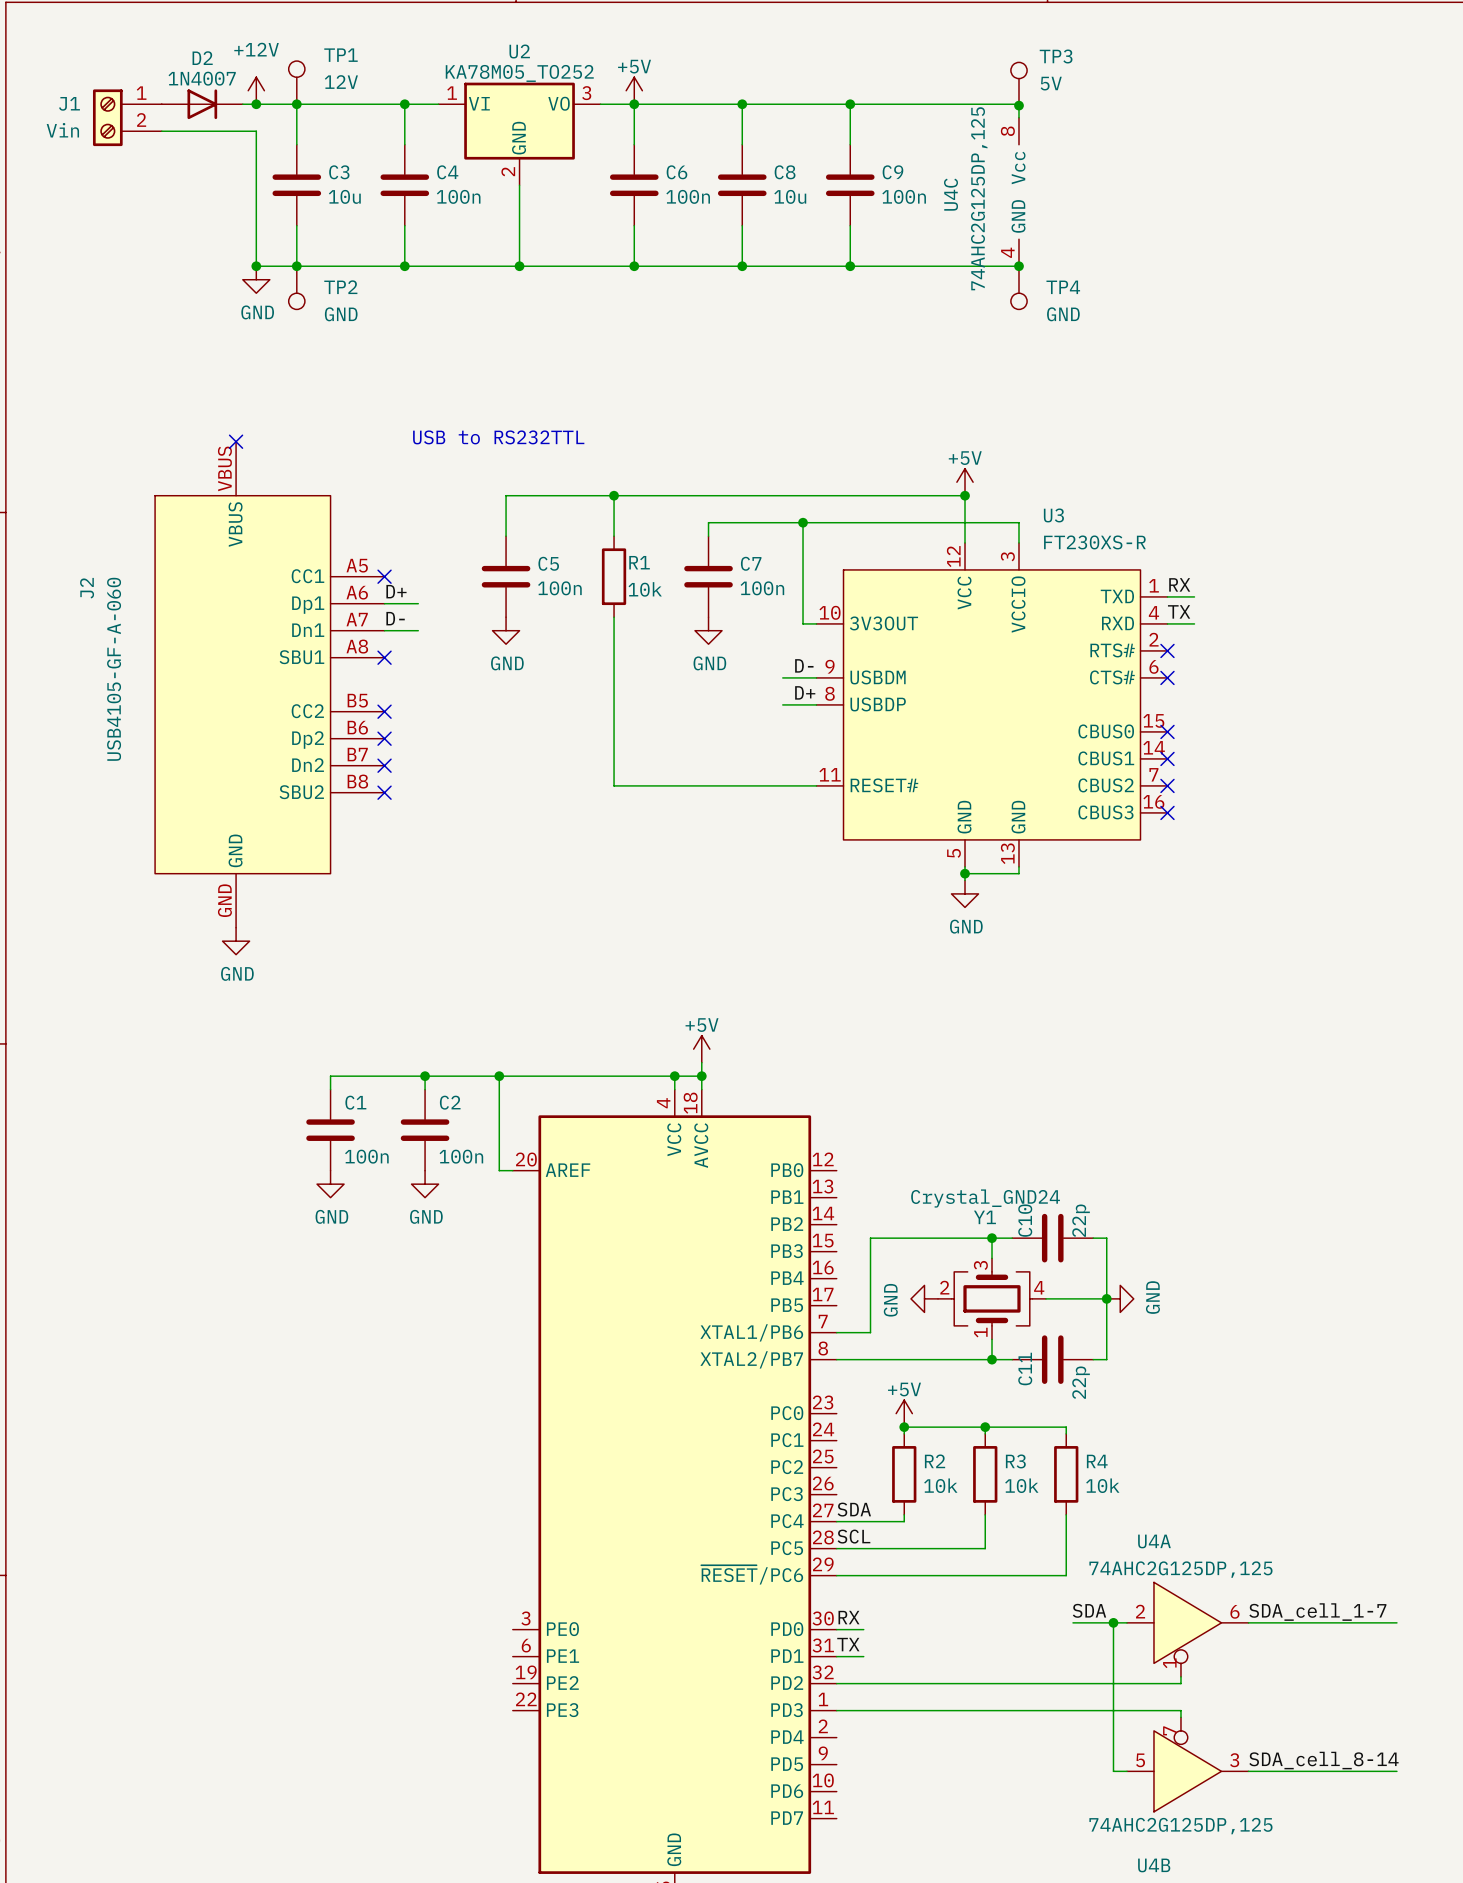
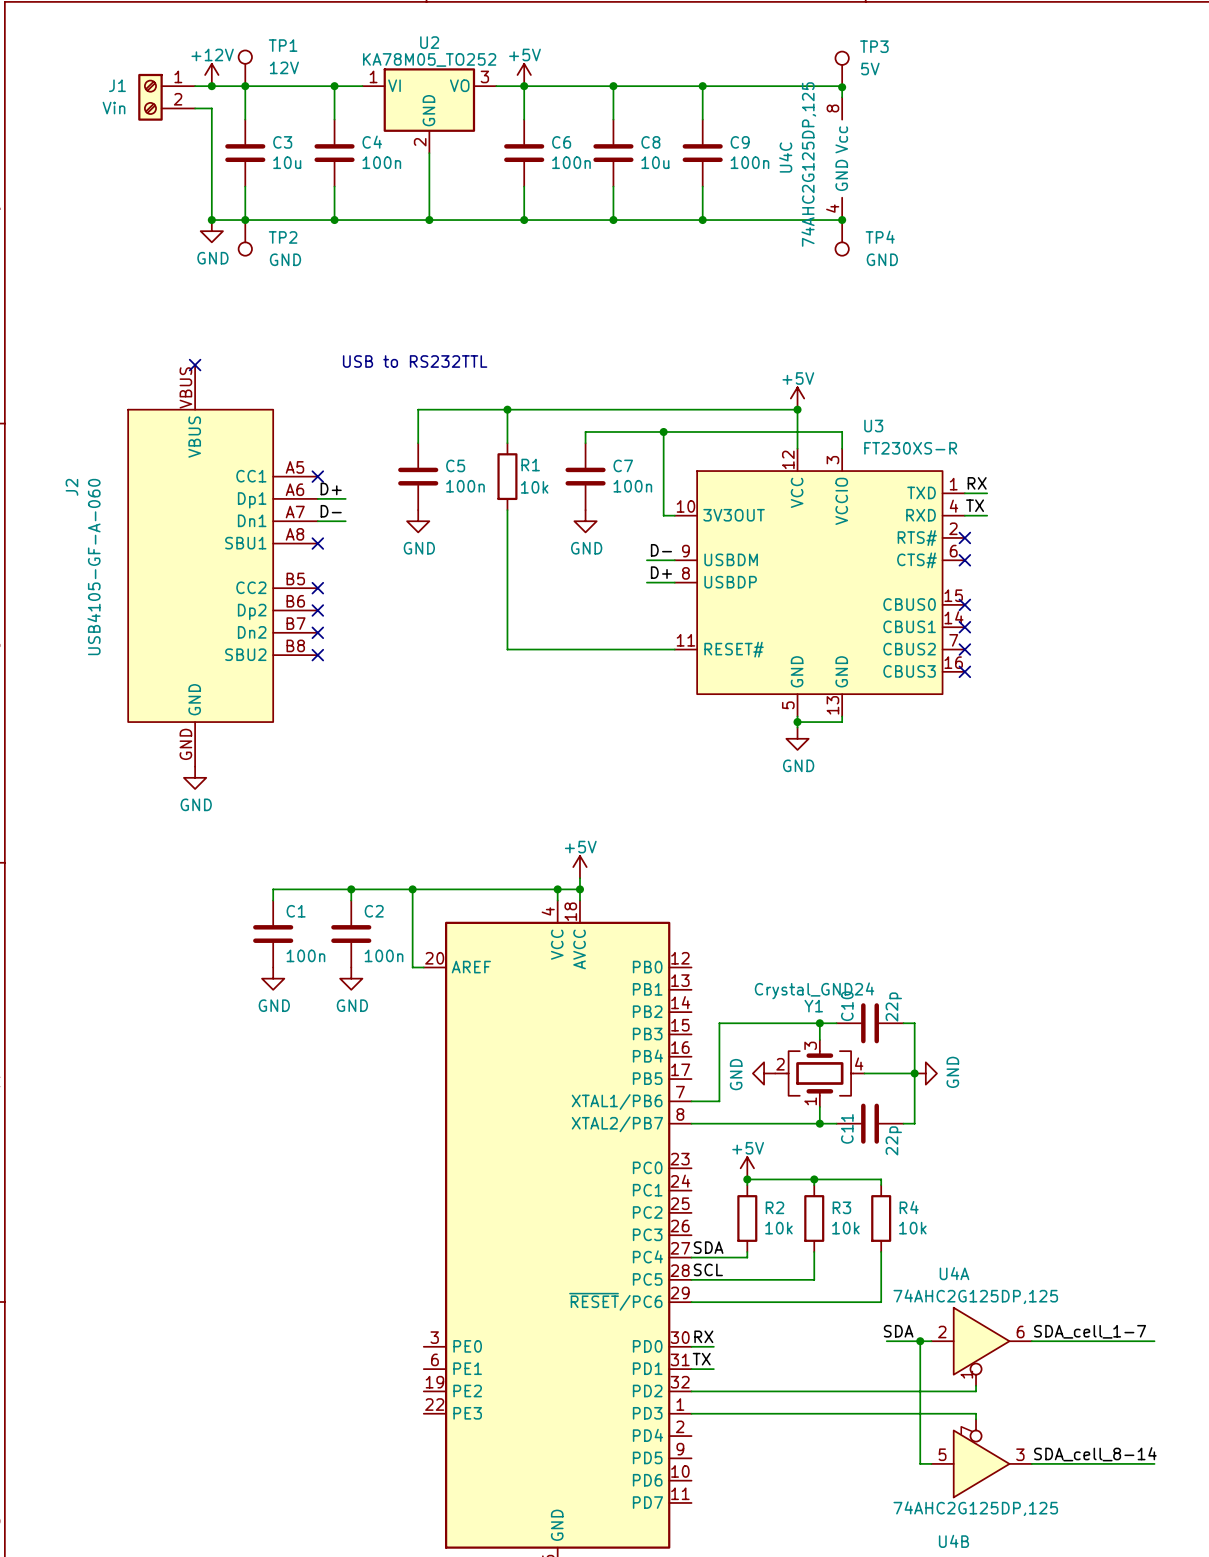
power symbol text position: +12V (256, 49) -> +12V (212, 54)
D2: 1N4007 (202, 104) -> none
J1 position: (127, 117) -> (166, 97)

